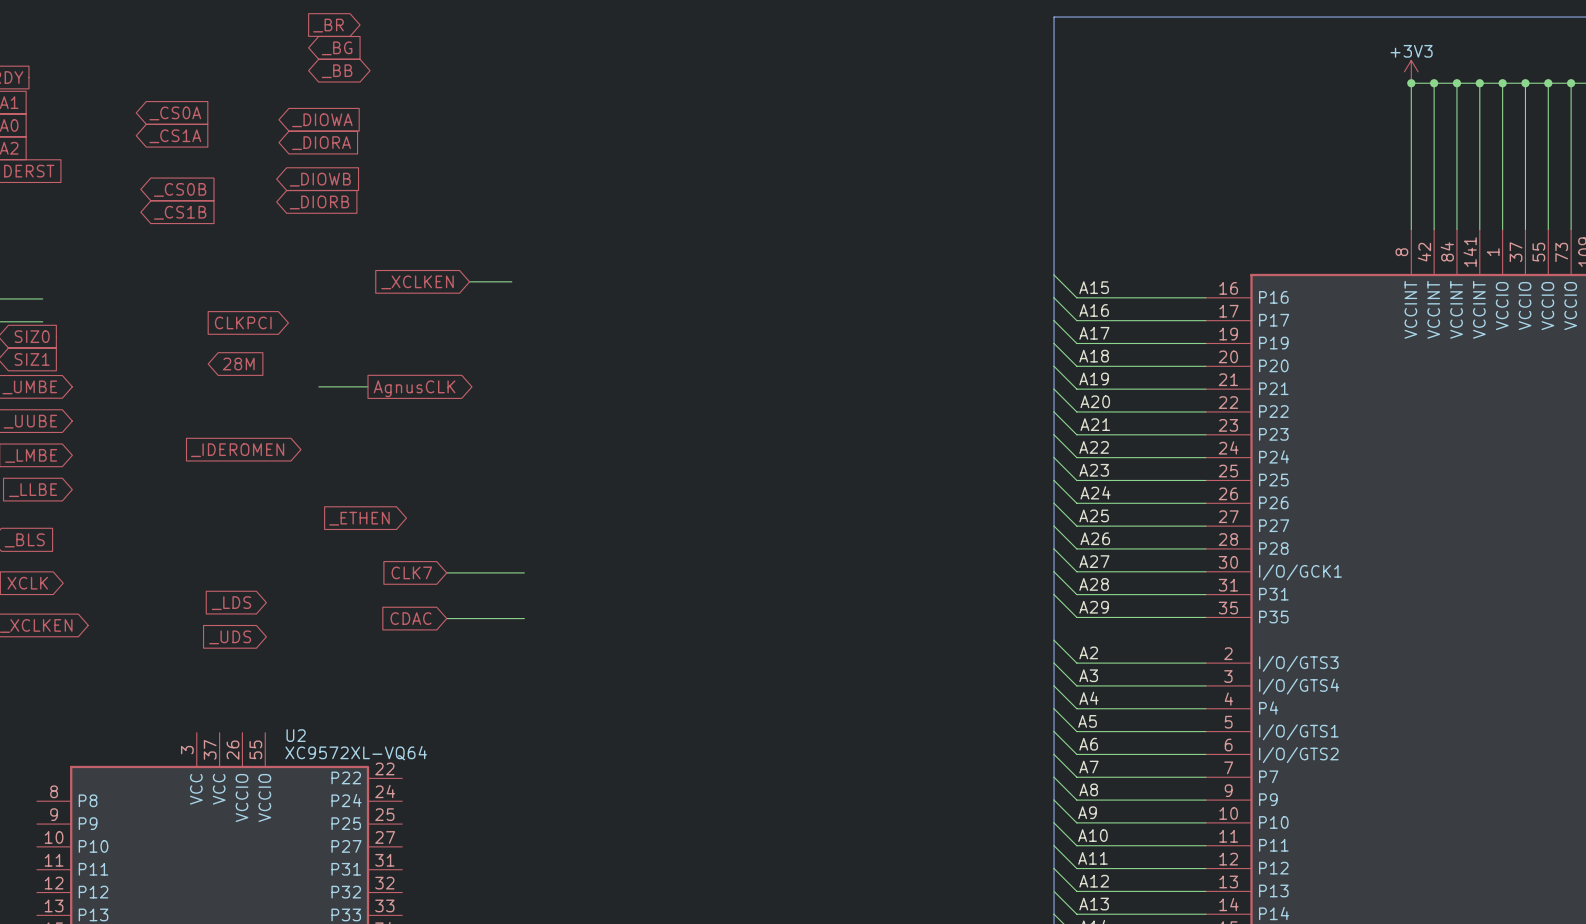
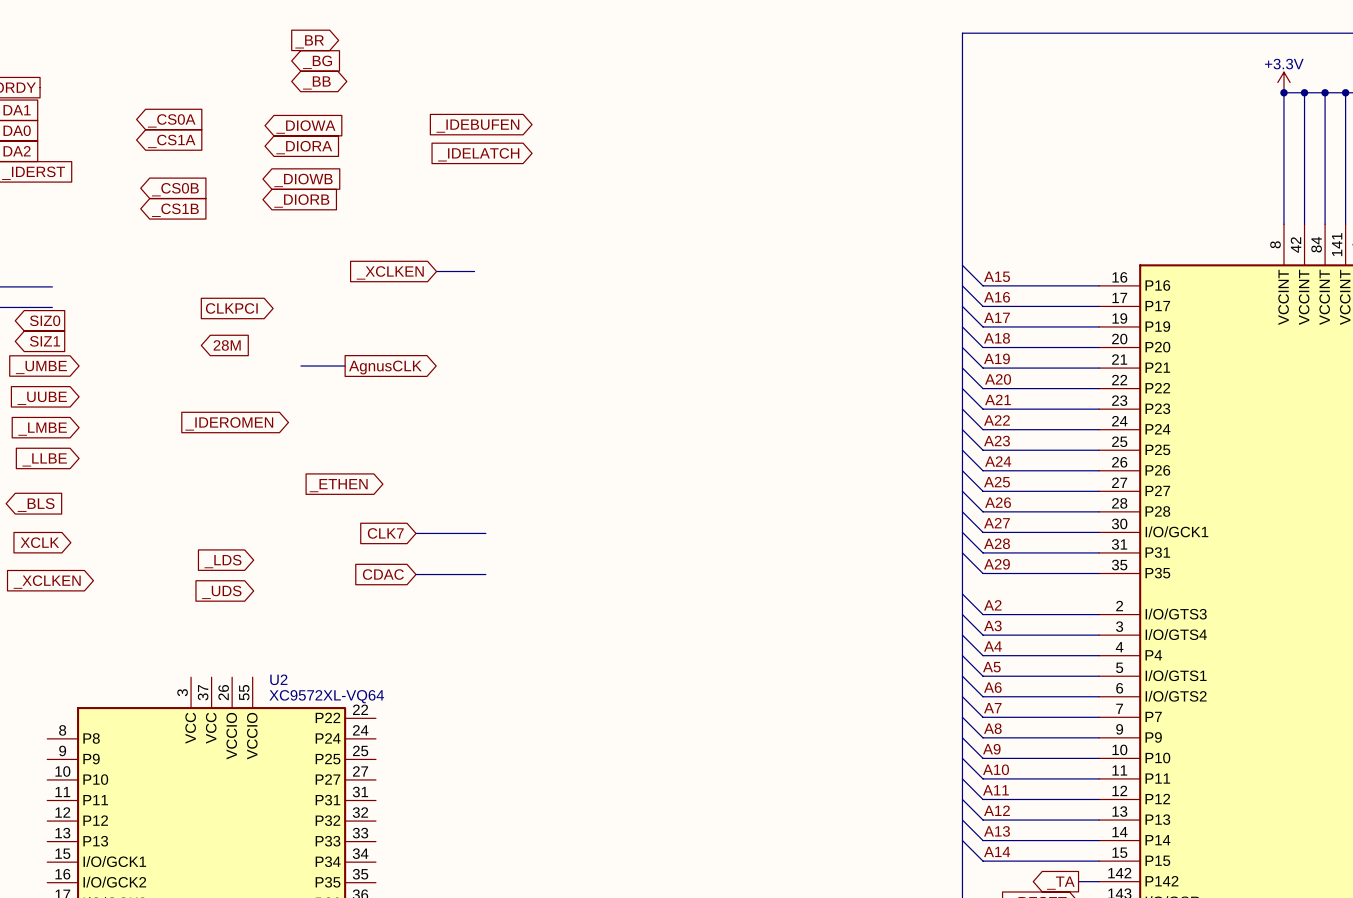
power symbol: +3V3 (1411, 71) -> +3.3V (1283, 82)
global label: none -> _IDEBUFEN (477, 126)
global label: none -> _IDELATCH (478, 154)

